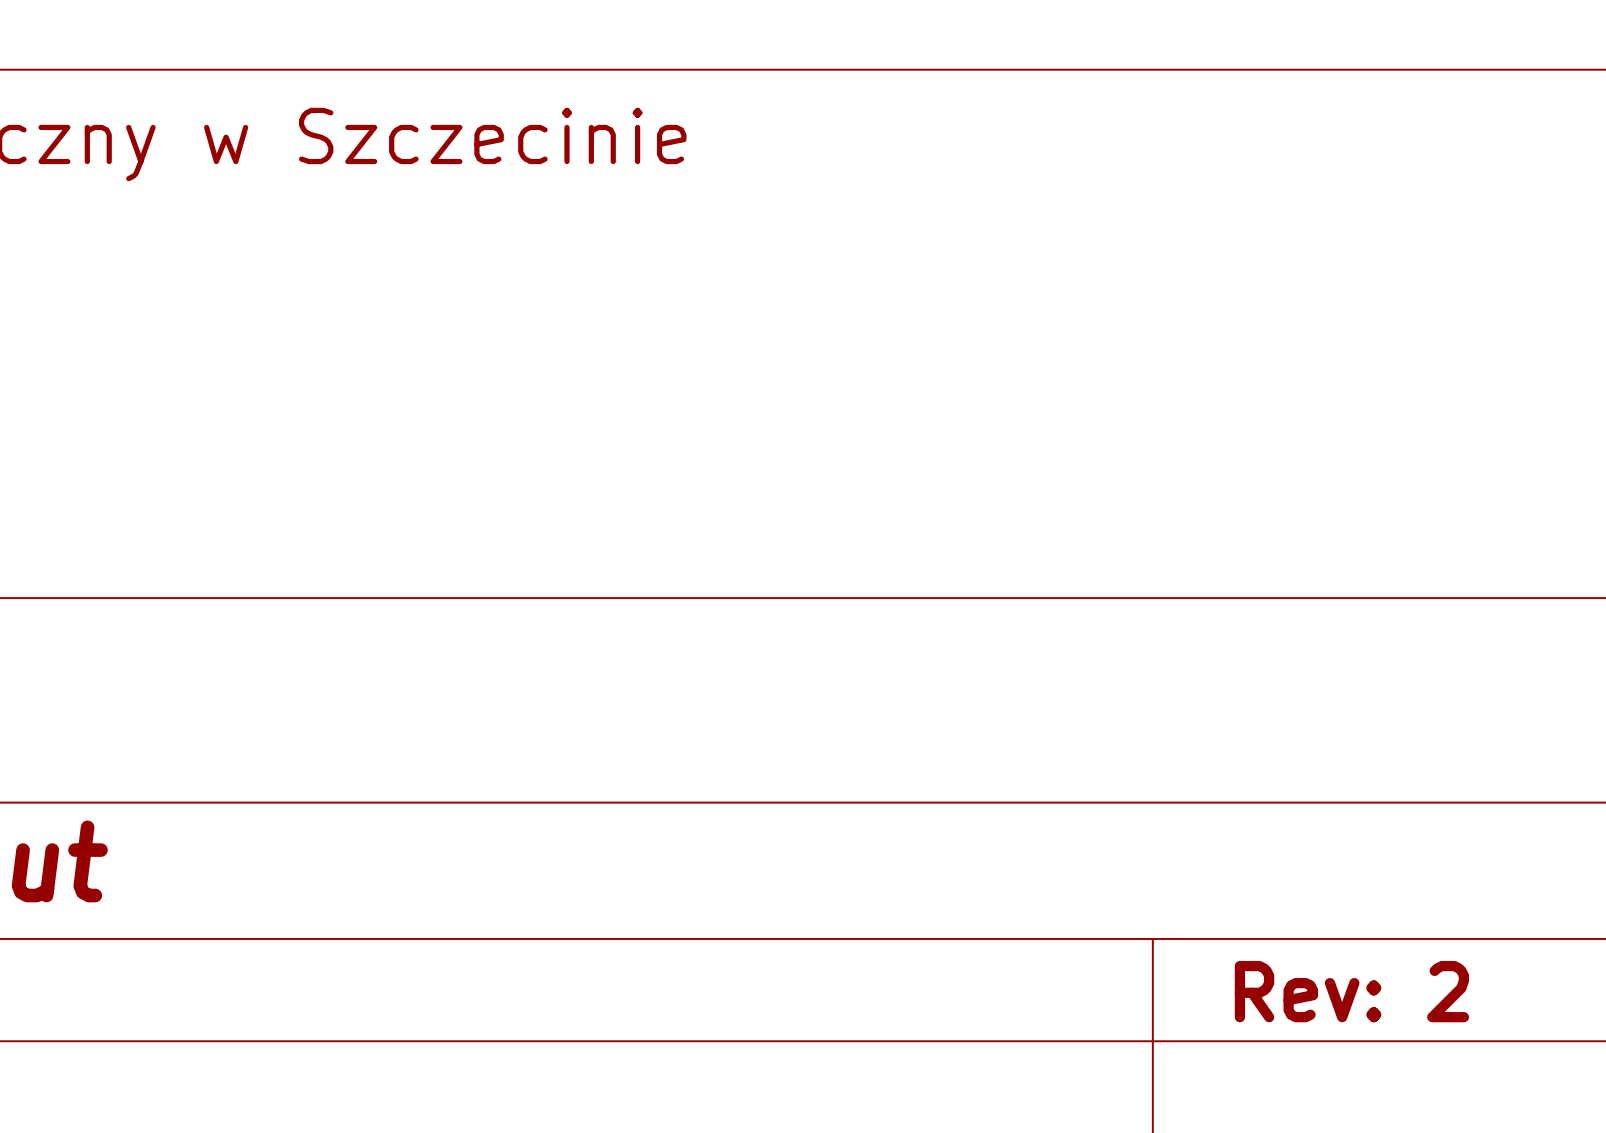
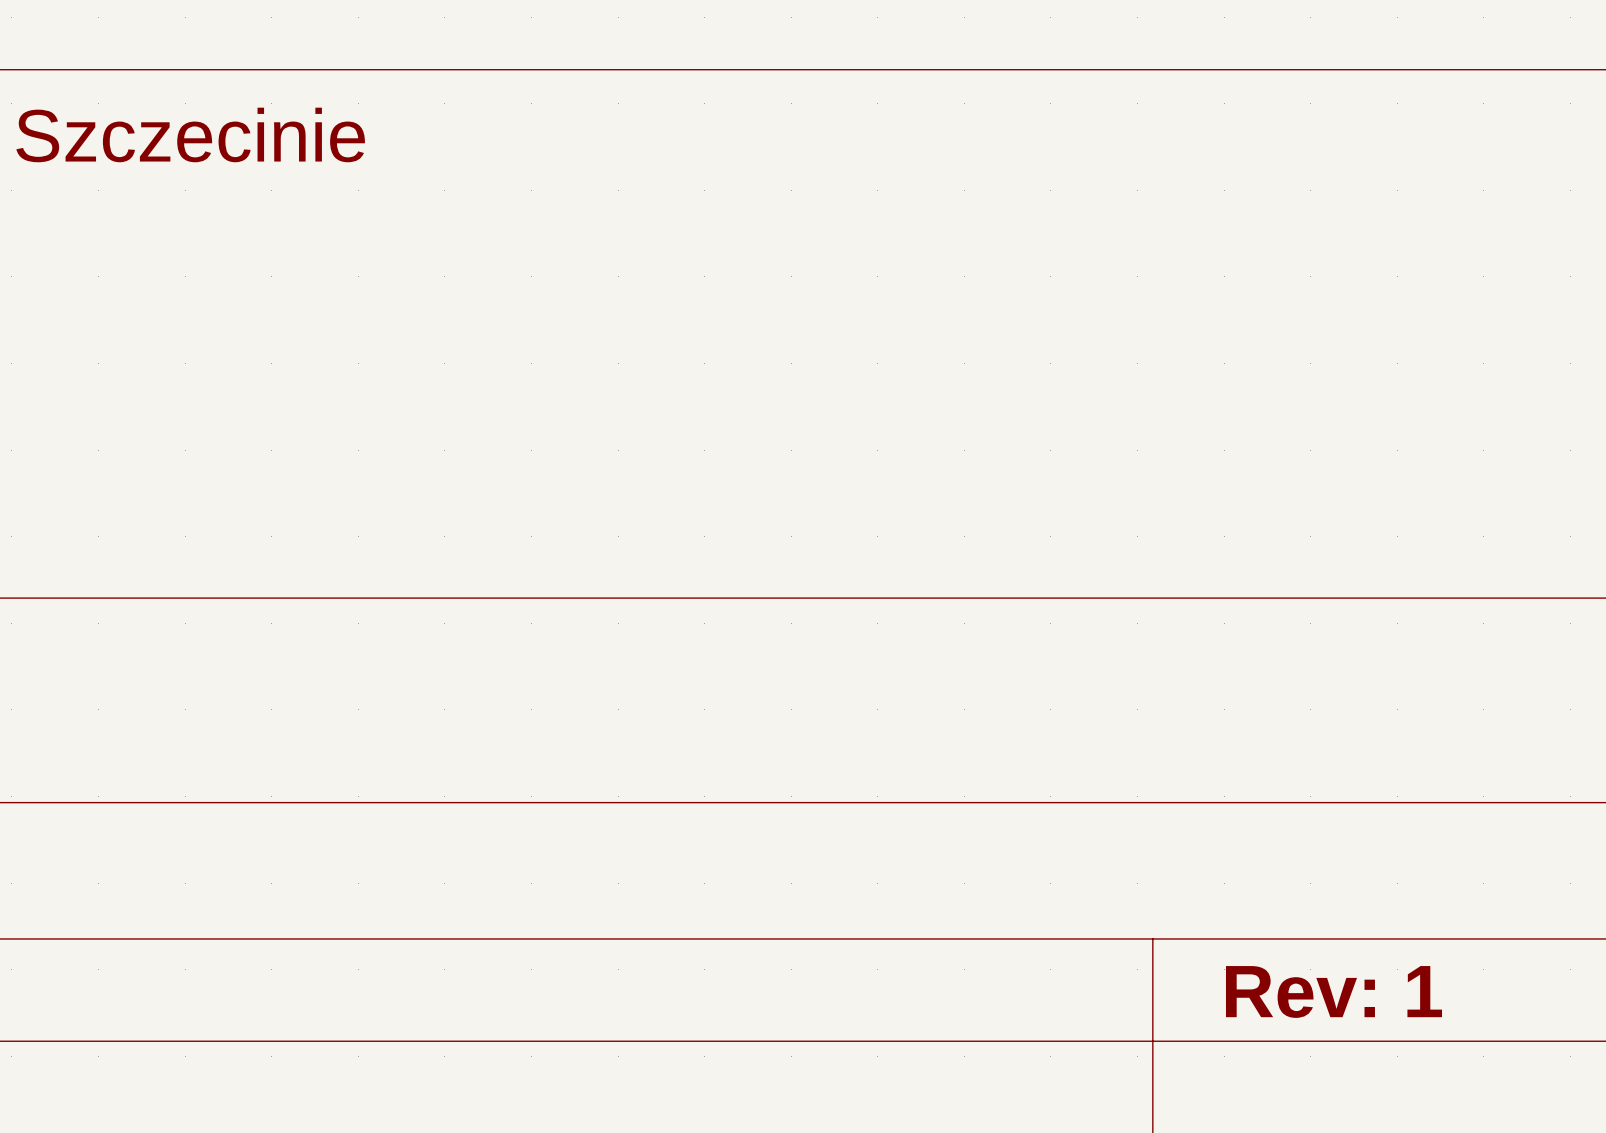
title block: Rev: 2 (1351, 991) -> Rev: 1 (1334, 991)

